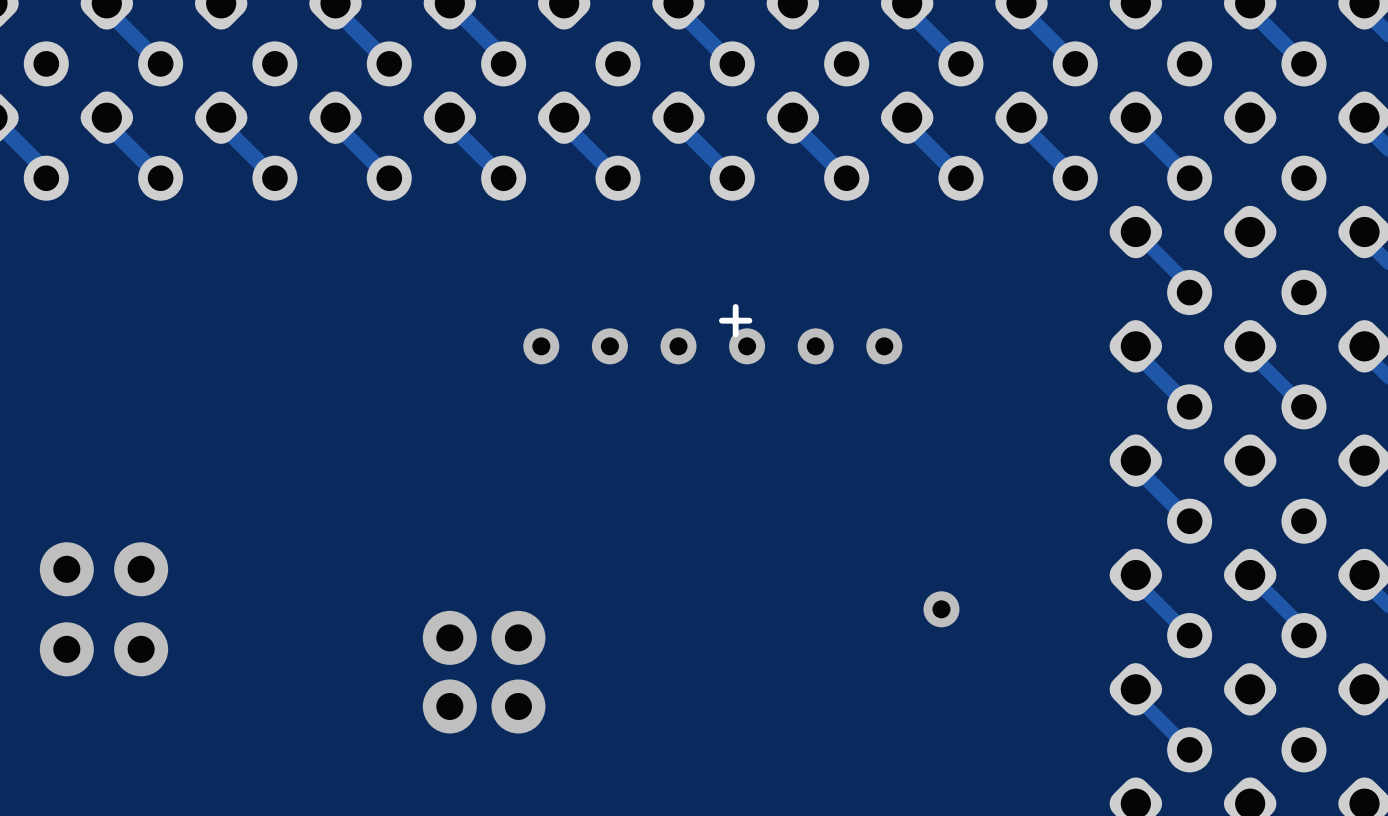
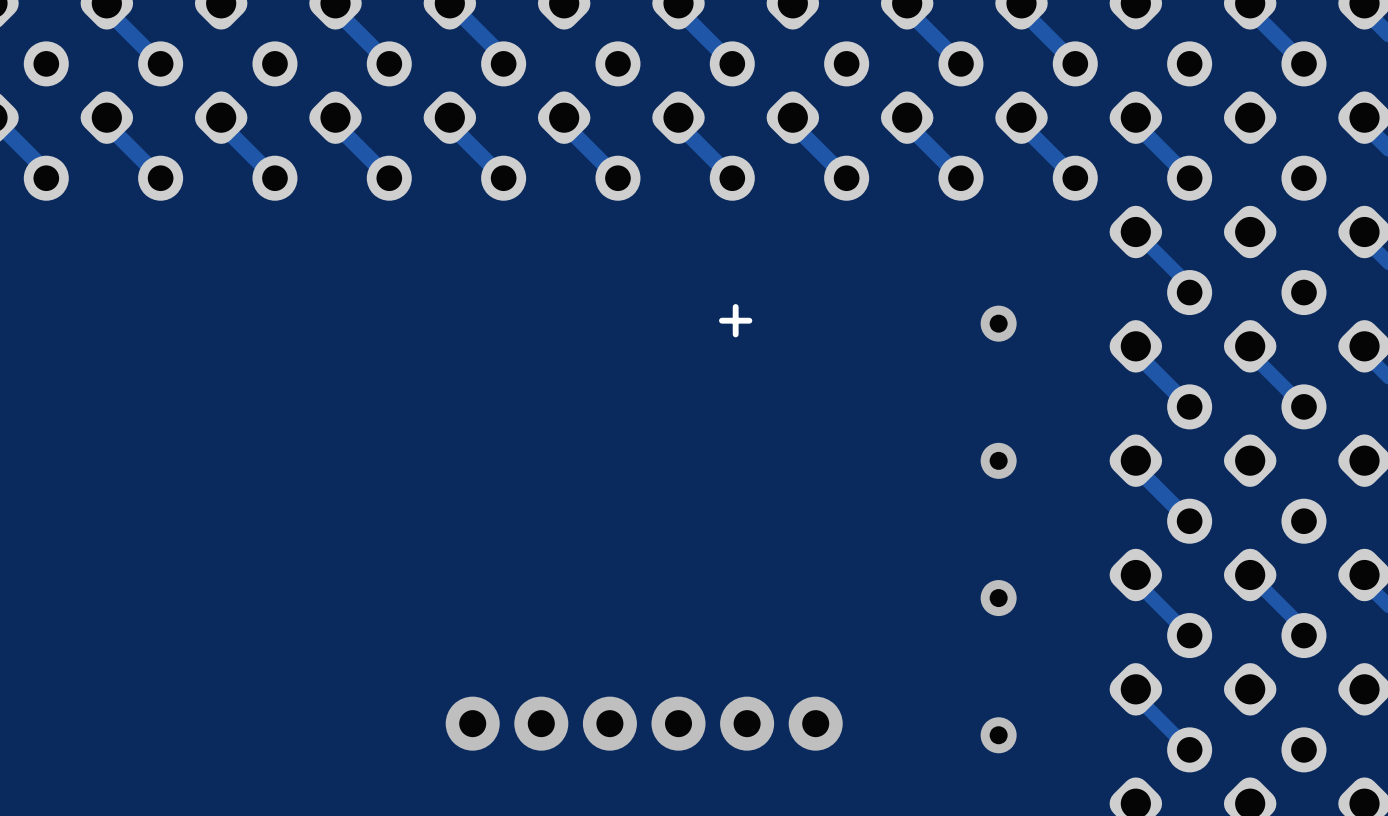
via: none -> (998, 323)
via: (541, 346) -> none
via: (609, 346) -> none
via: (678, 346) -> none
via: (747, 346) -> none
via: (815, 346) -> none
via: (884, 346) -> none
via: none -> (998, 460)
via: (66, 569) -> none
via: (141, 569) -> none
via position: (941, 609) -> (998, 598)
via: (449, 637) -> none
via: (518, 637) -> none
via: (66, 649) -> none
via: (141, 649) -> none
via: (449, 706) -> none
via: (518, 706) -> none
via: none -> (472, 723)
via: none -> (541, 723)
via: none -> (609, 723)
via: none -> (678, 723)
via: none -> (747, 723)
via: none -> (815, 723)
via: none -> (998, 735)

